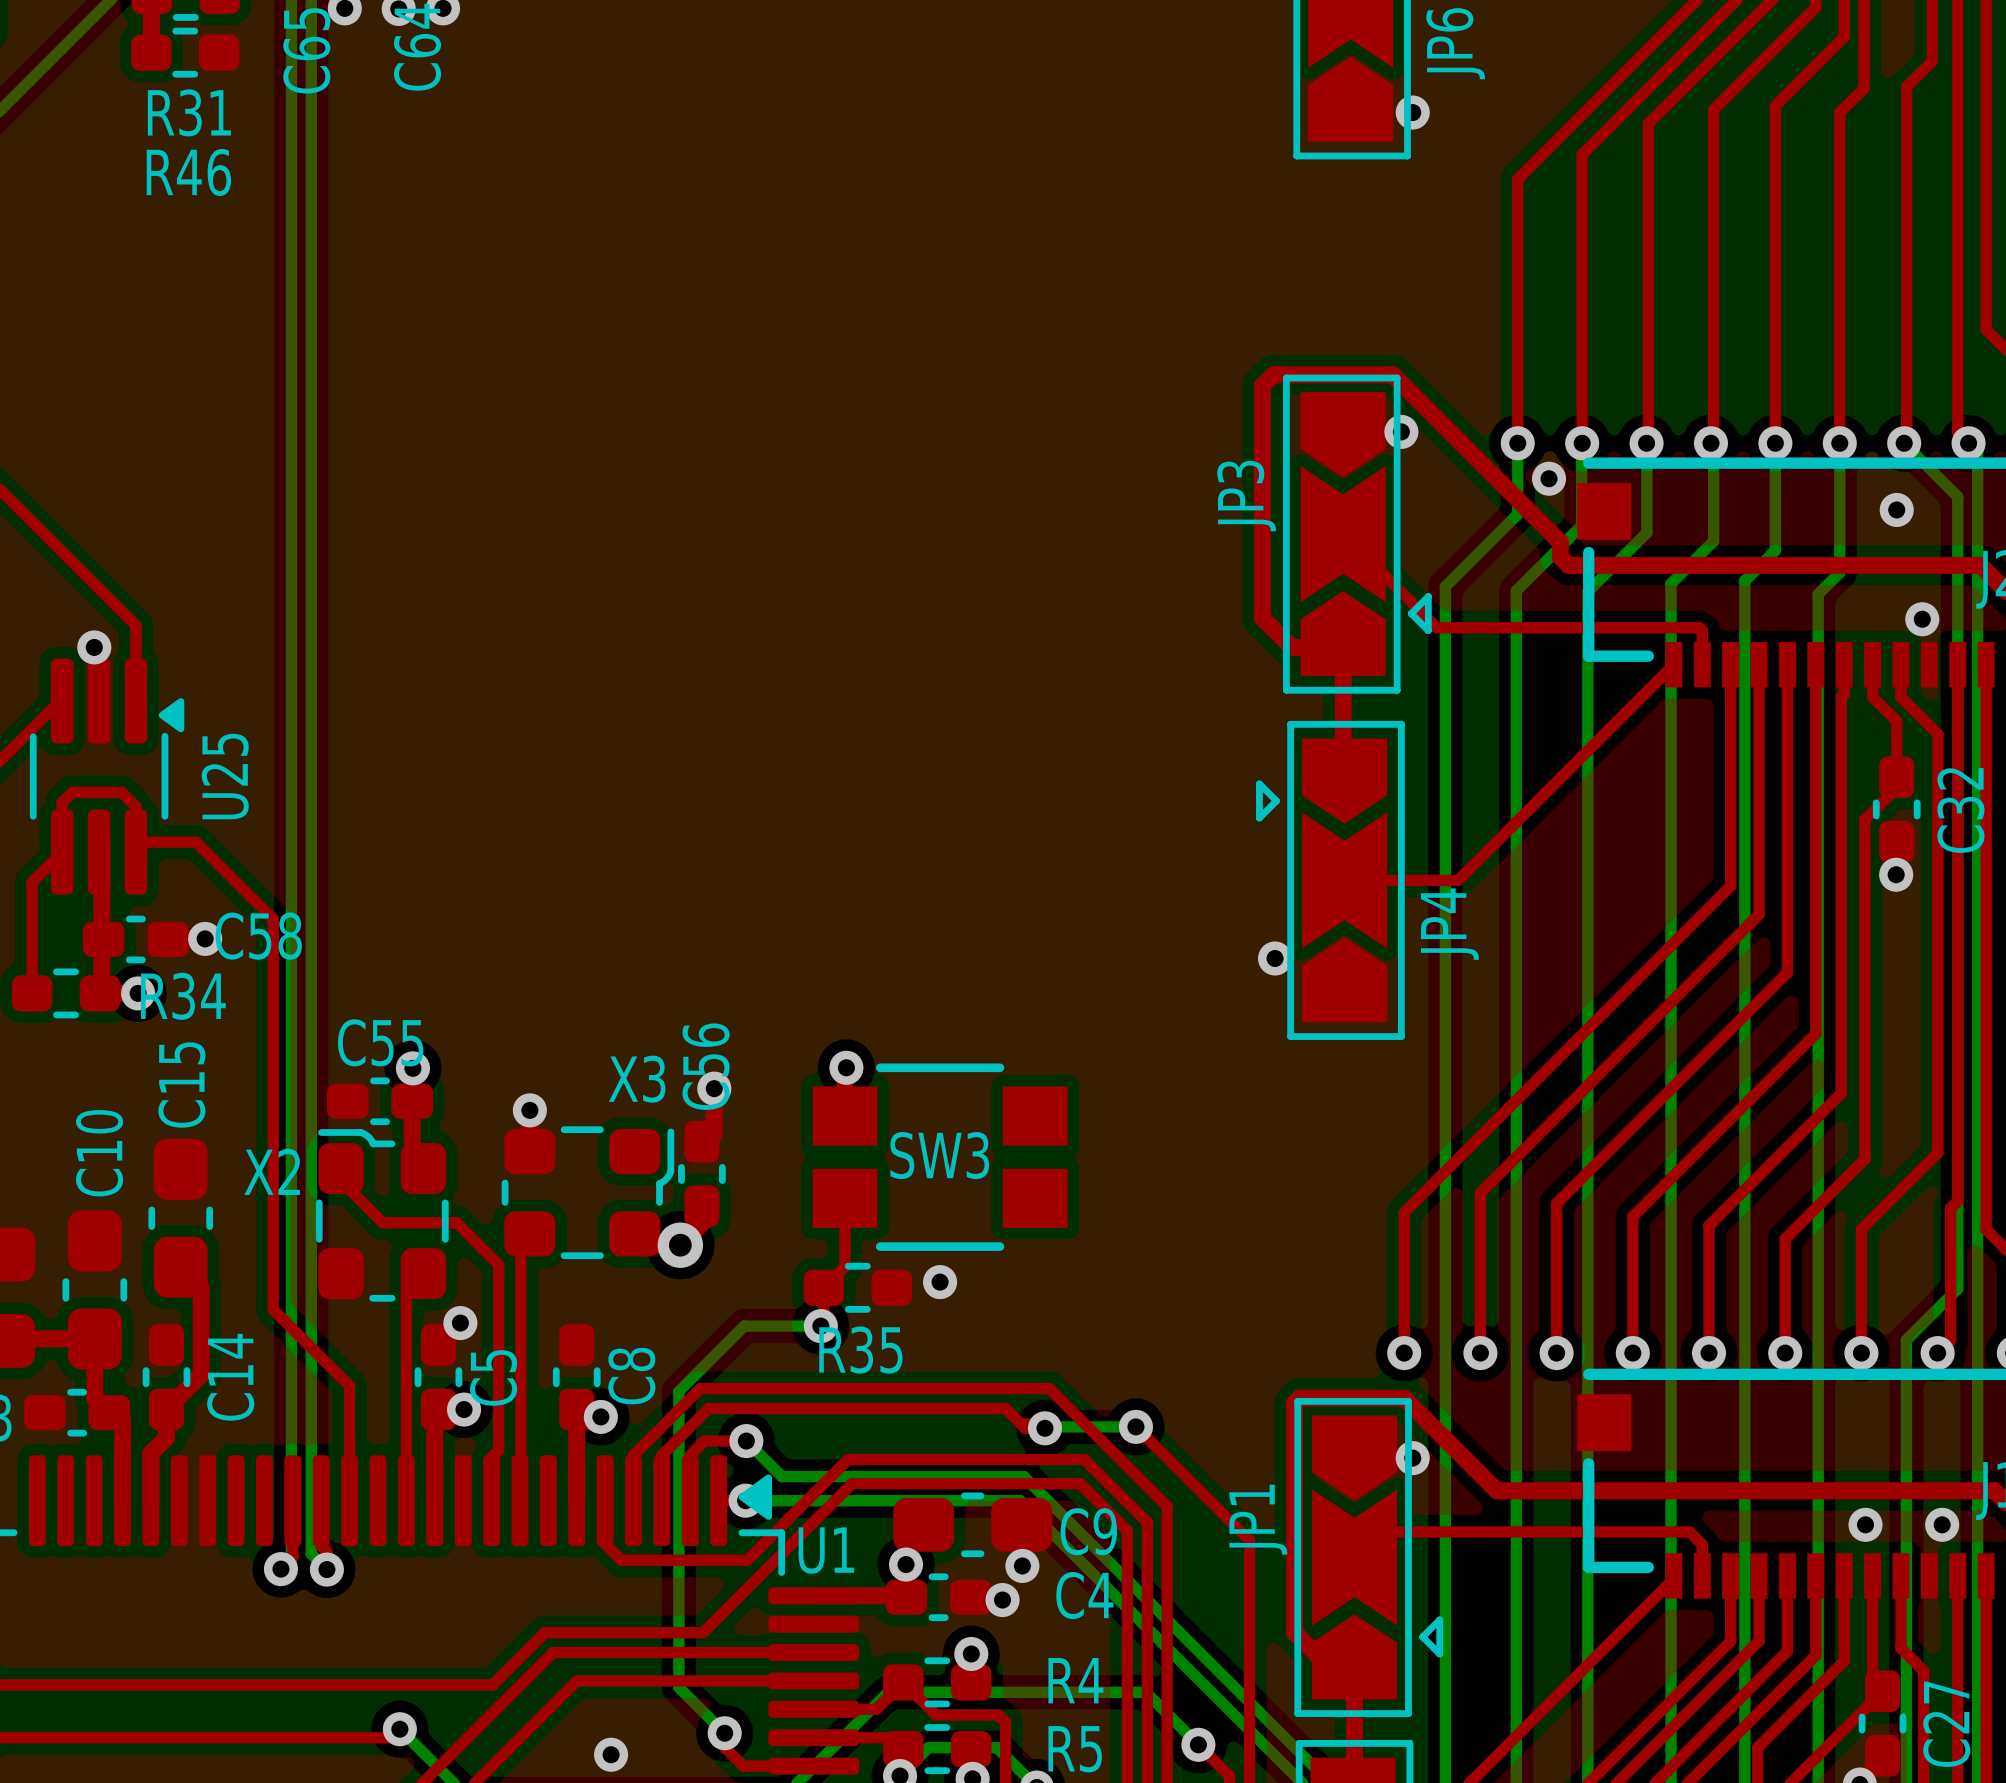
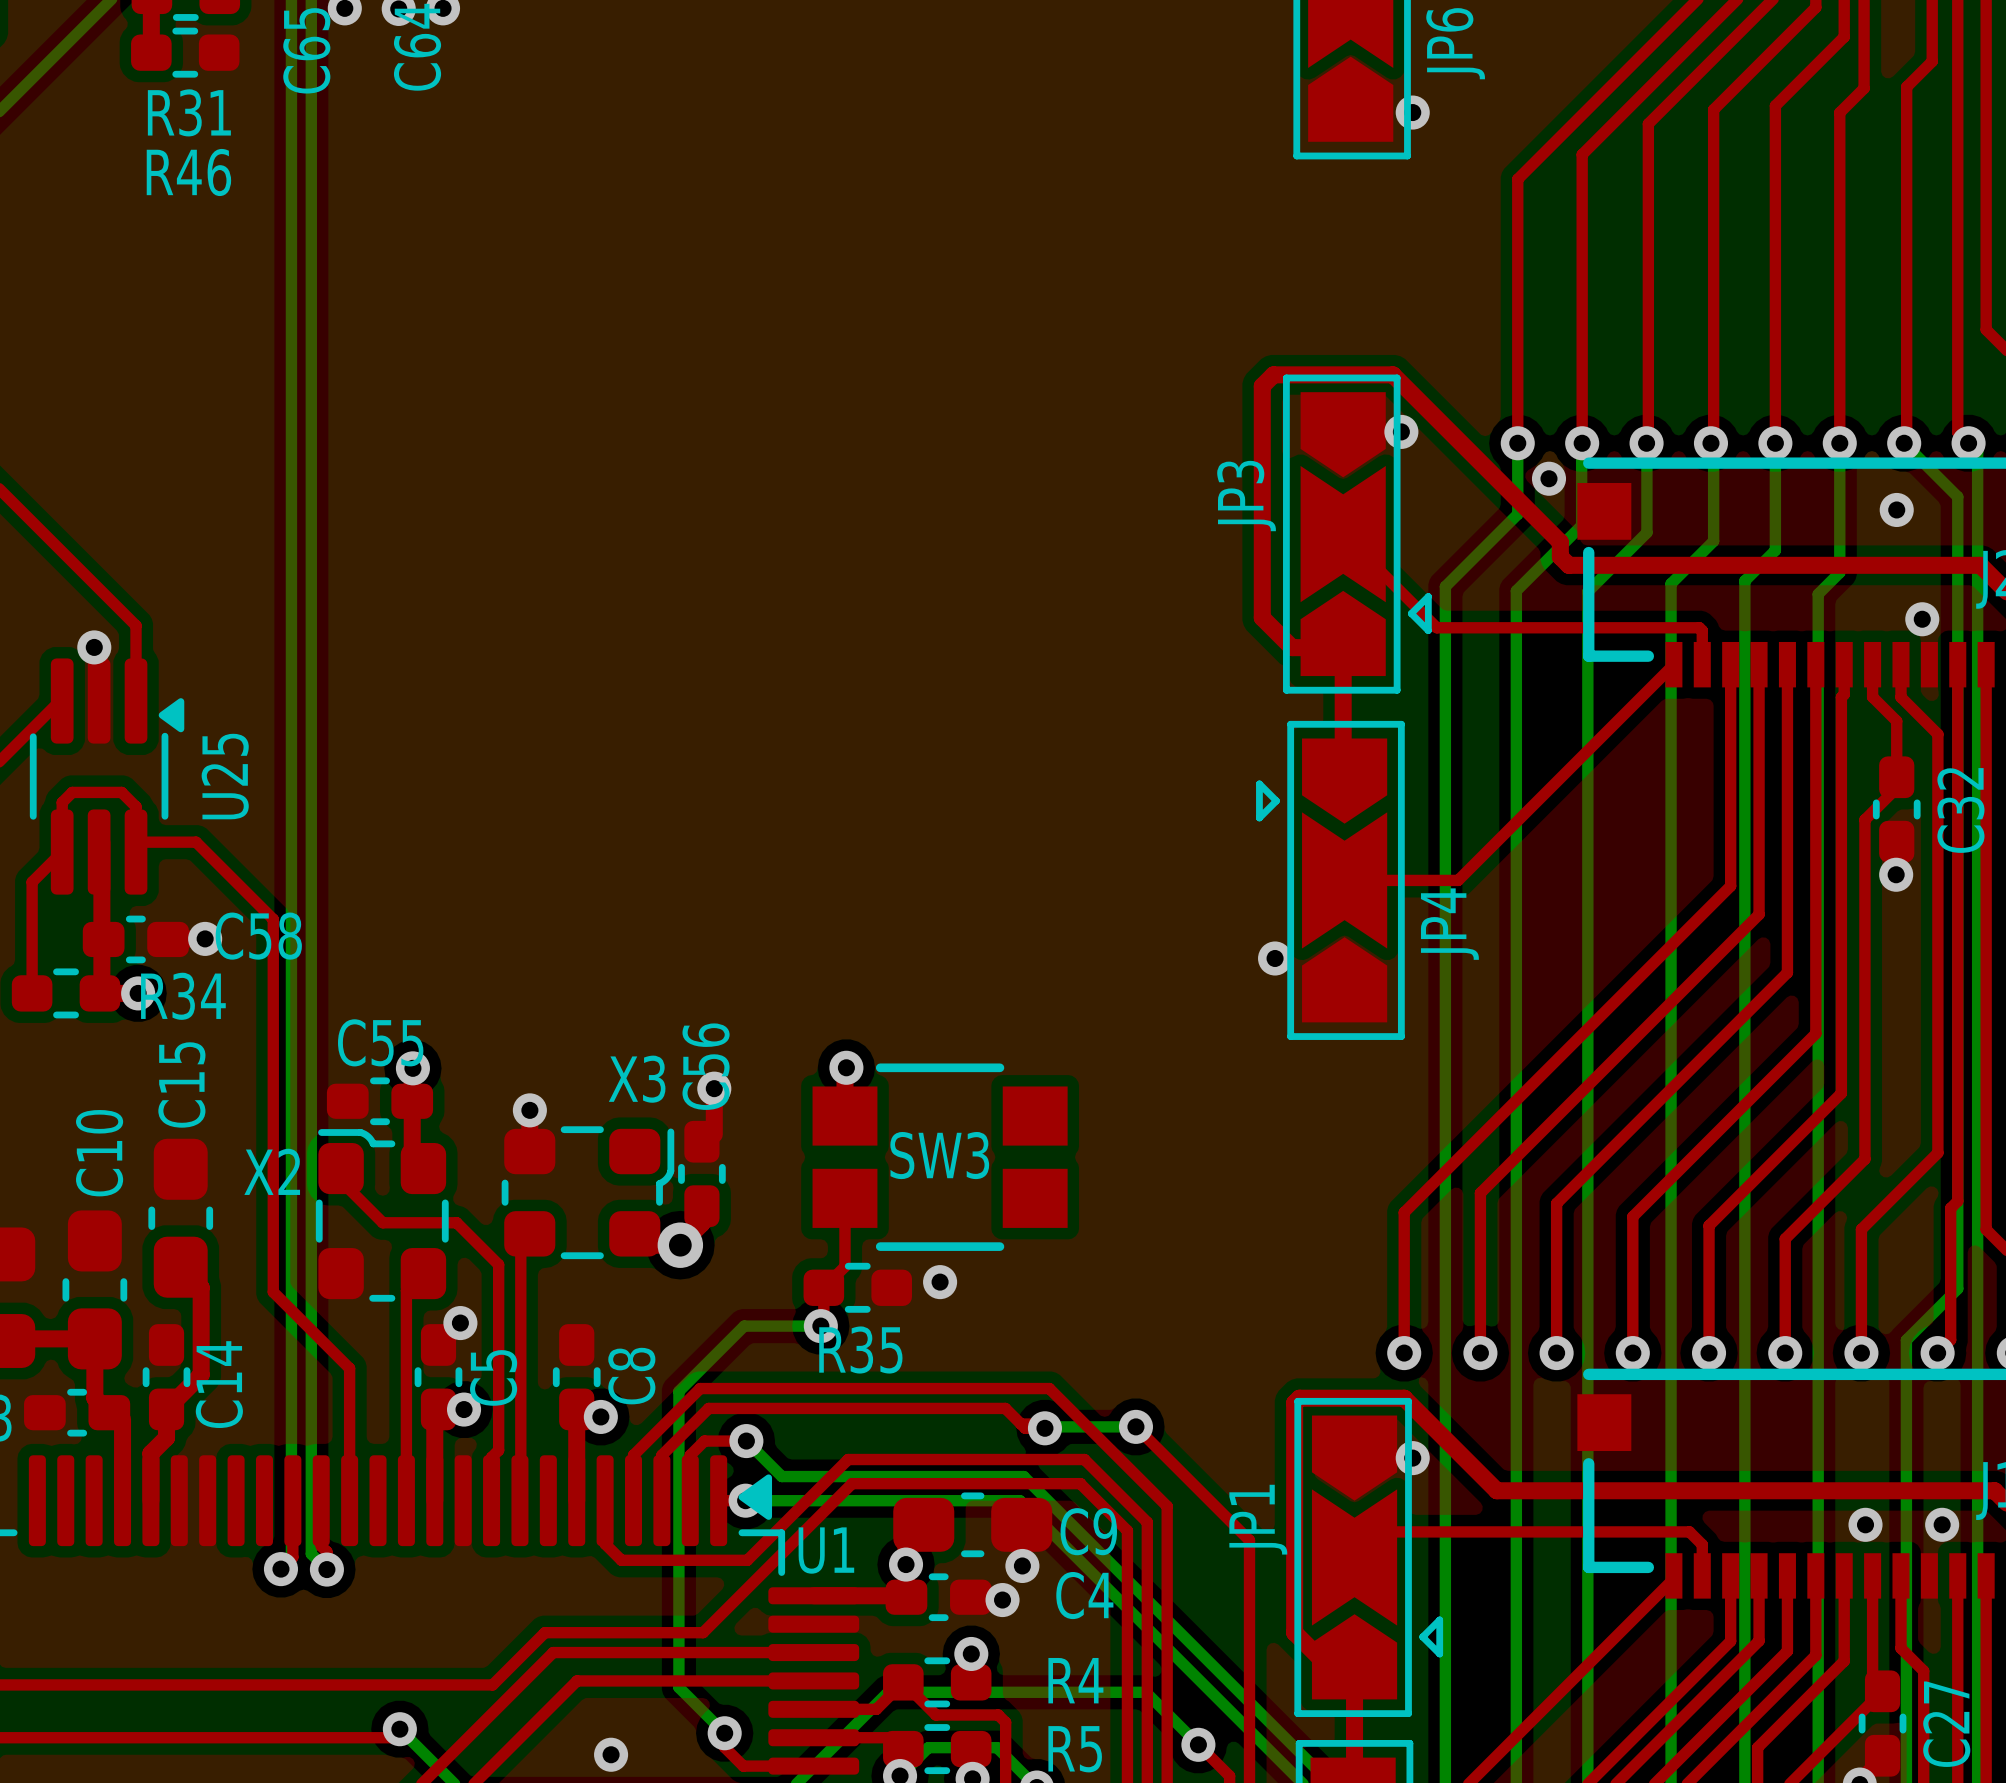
top track: (273, 1292) (273, 1309) (349, 1386) -> (273, 1292) (349, 1368) (349, 1386)
C14 name position: C14 (230, 1377) -> C14 (219, 1384)

